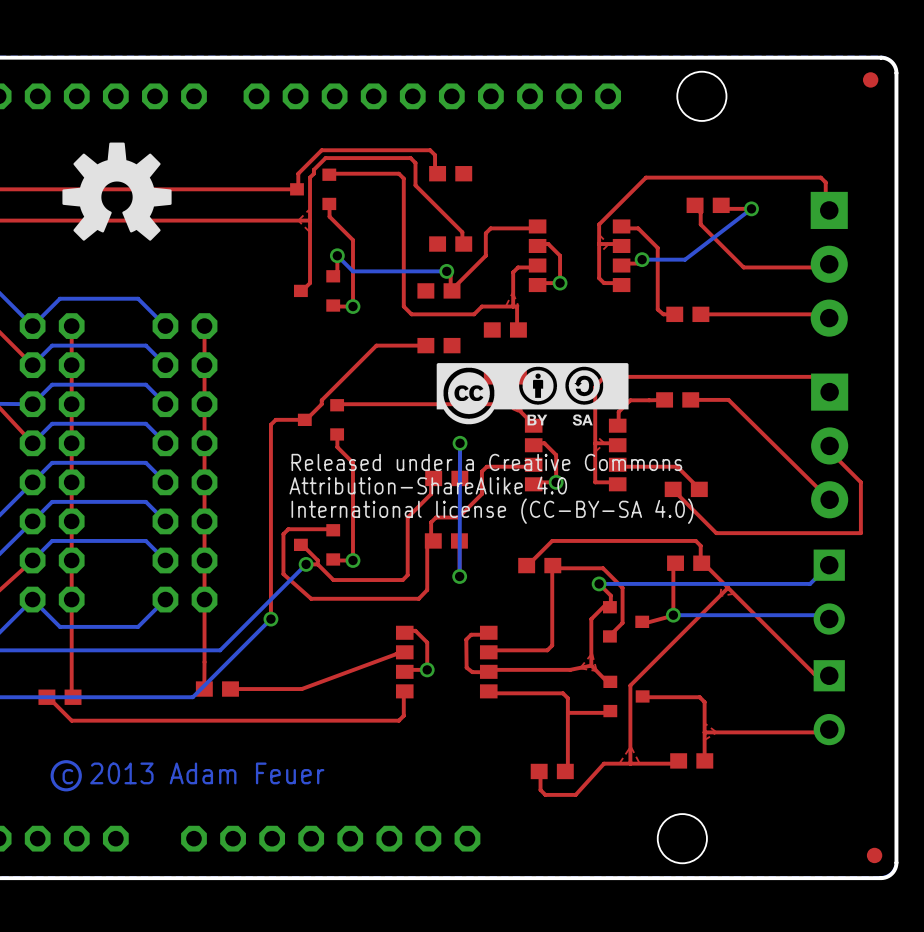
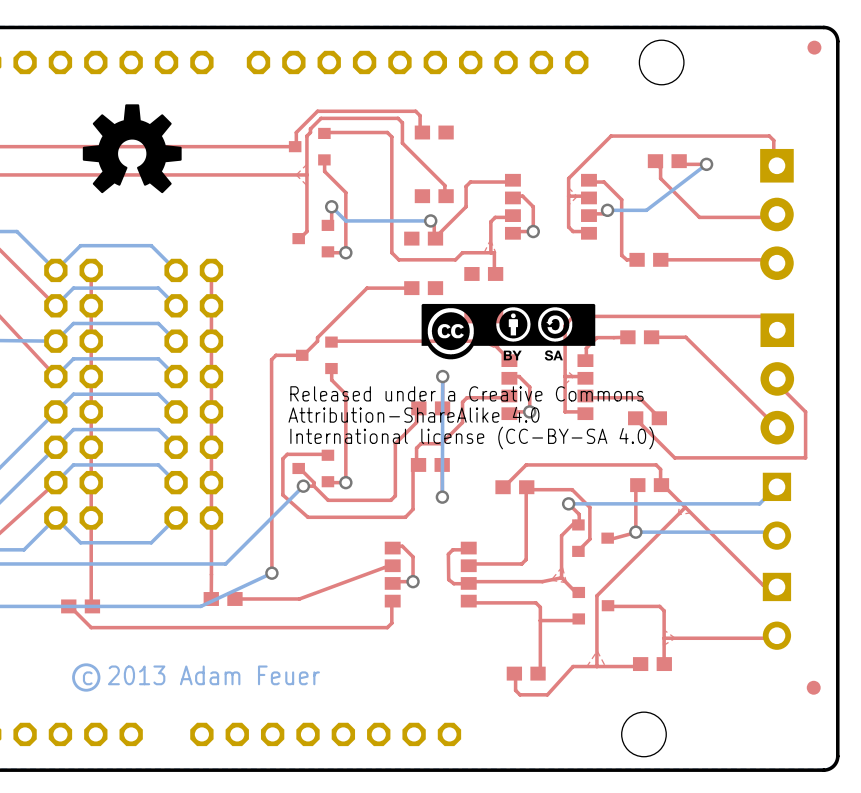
top track: (270, 424) (270, 619) -> (271, 359) (271, 573)
bottom track: (270, 619) (192, 697) -> (271, 573) (200, 606)
via position: (270, 619) -> (271, 573)
part position: (874, 855) -> (813, 687)

